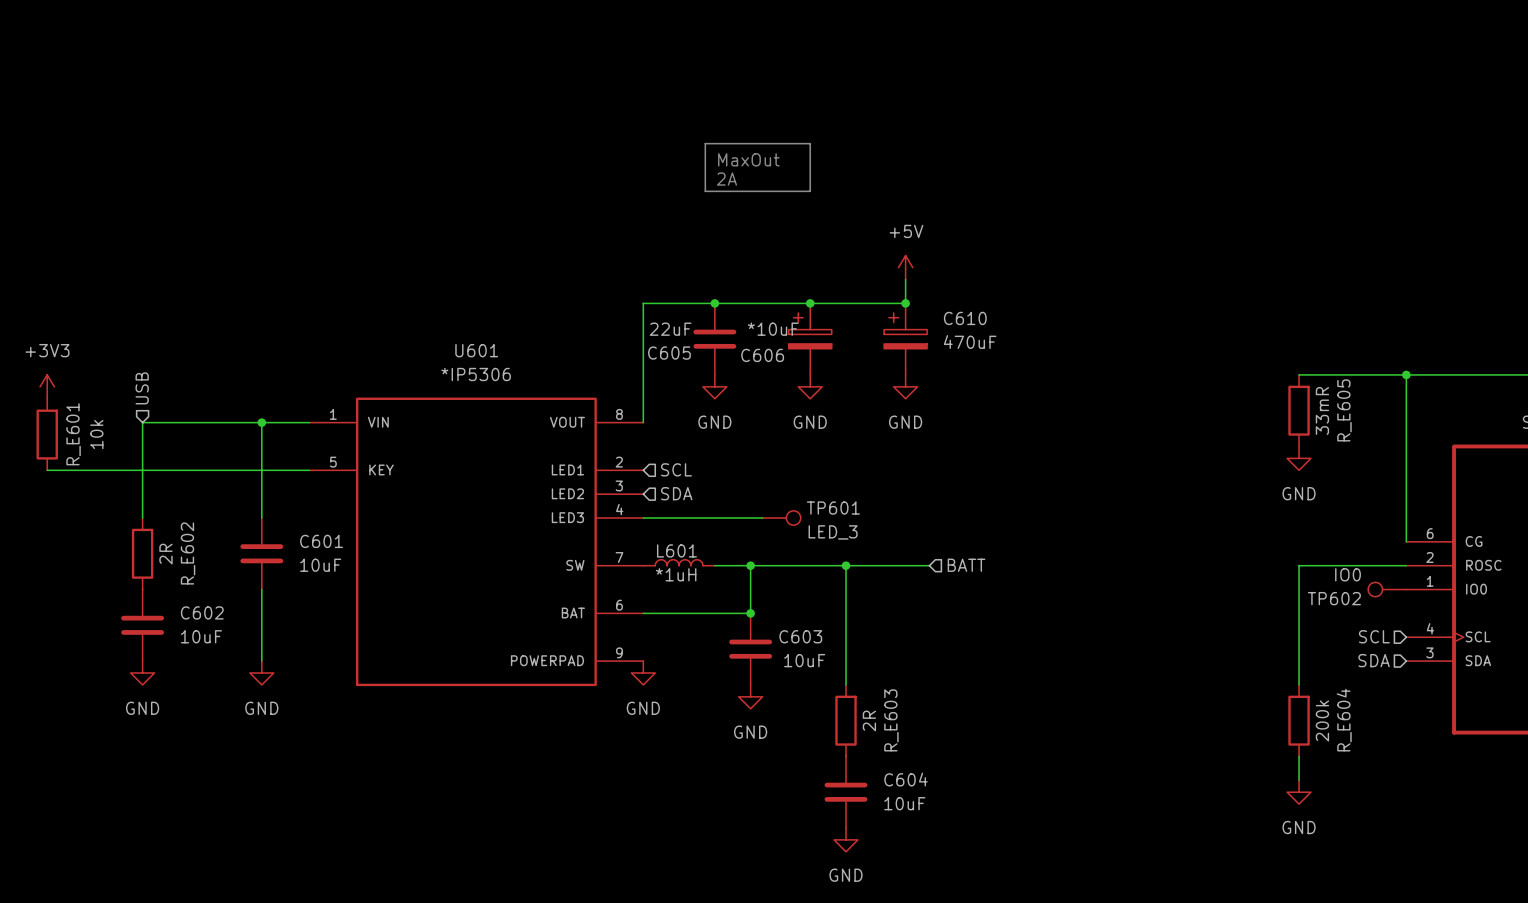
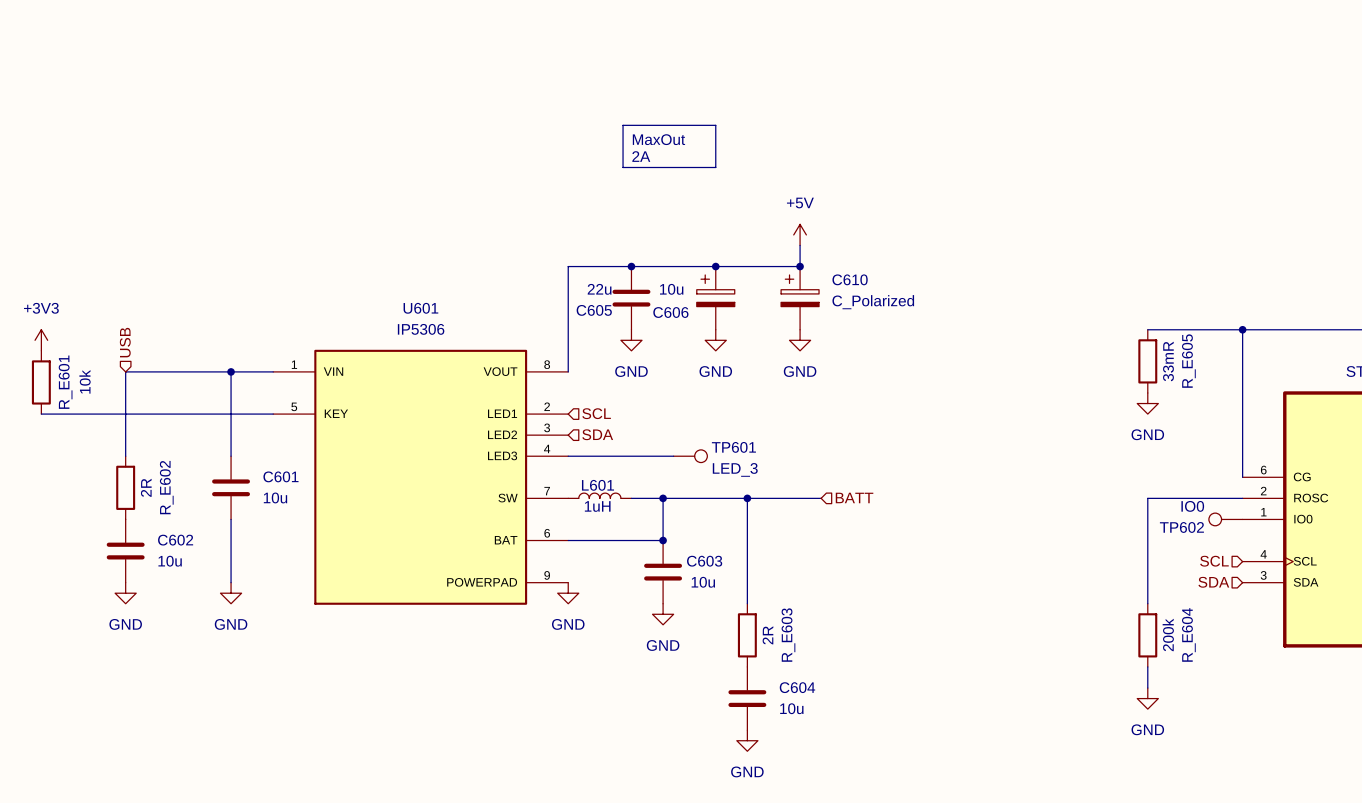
C605 value: 22uF (670, 329) -> 22u (599, 289)
C606 value: *10uF (773, 329) -> 10u (671, 289)
C610 value: 470uF (970, 342) -> C_Polarized (873, 302)
U601 value: *IP5306 (476, 374) -> IP5306 (421, 329)
C601 value: 10uF (320, 565) -> 10u (275, 497)
L601 value: *1uH (676, 574) -> 1uH (597, 506)
C602 value: 10uF (201, 636) -> 10u (170, 561)
C603 value: 10uF (804, 660) -> 10u (703, 582)
C604 value: 10uF (904, 803) -> 10u (791, 708)

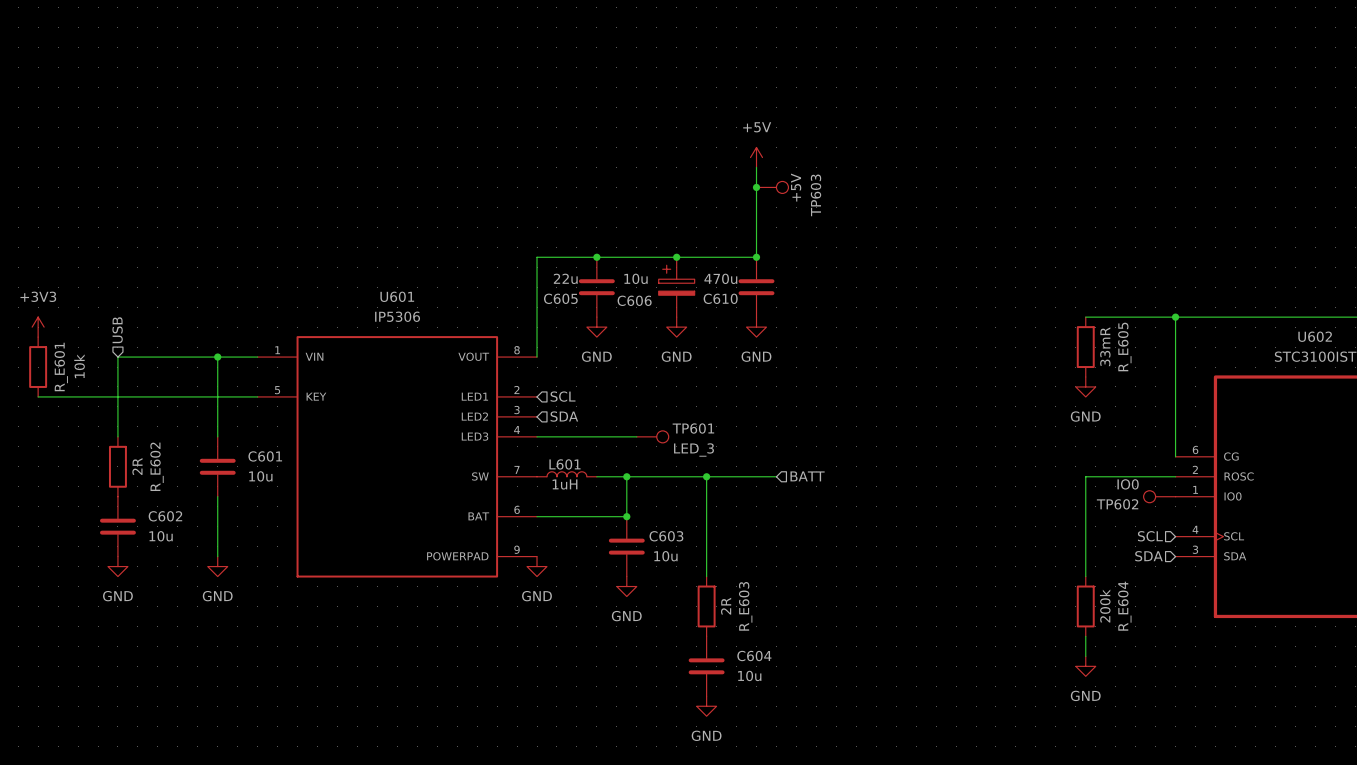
line: (623, 125) (715, 125) (715, 167) (623, 167) (623, 125) -> none
text: MaxOut (658, 139) -> none
text: 2A (641, 156) -> none
wire: none -> (756, 167) (756, 237)
junction: none -> (756, 187)
TP603: none -> +5V (772, 187)
power symbol position: +5V (800, 234) -> +5V (756, 157)
C610 symbol: [781, 266, 820, 330] -> [738, 257, 775, 318]
C610 name position: C610 (850, 279) -> C610 (720, 298)
C610 value: C_Polarized (873, 302) -> 470u (720, 278)

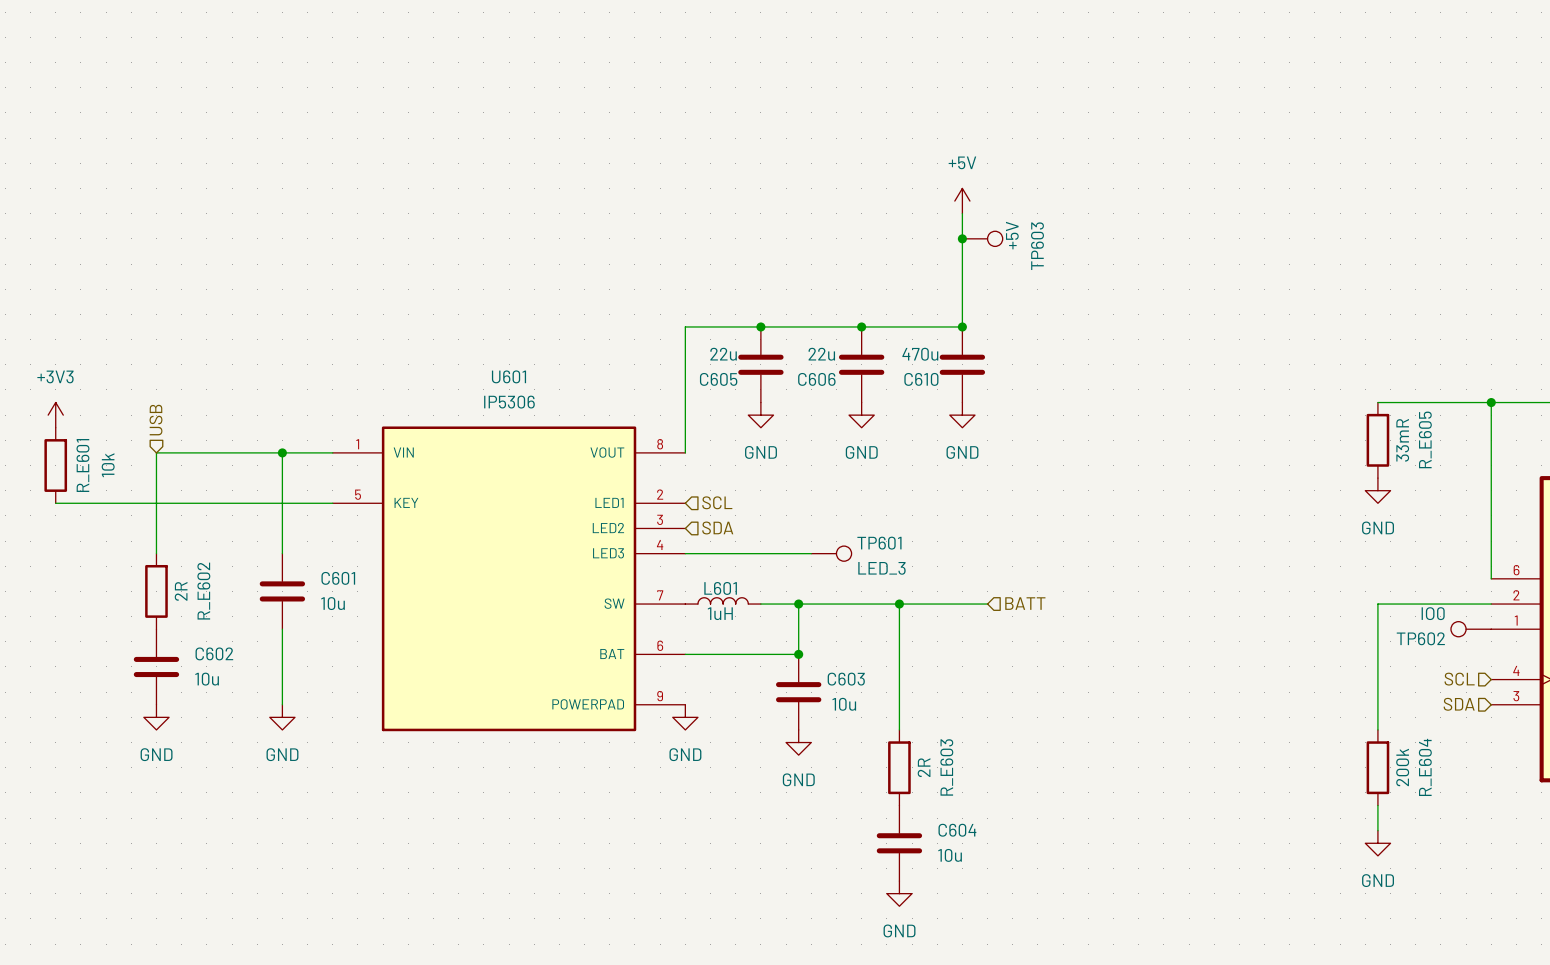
C606 symbol: [658, 257, 695, 318] -> [838, 326, 885, 403]
C606 value: 10u (635, 278) -> 22u (821, 354)

